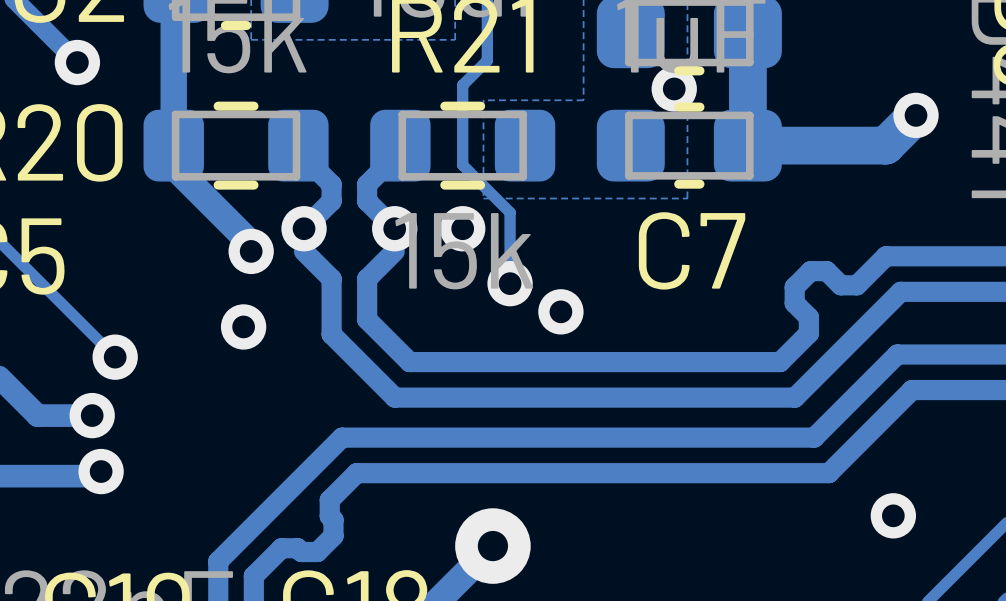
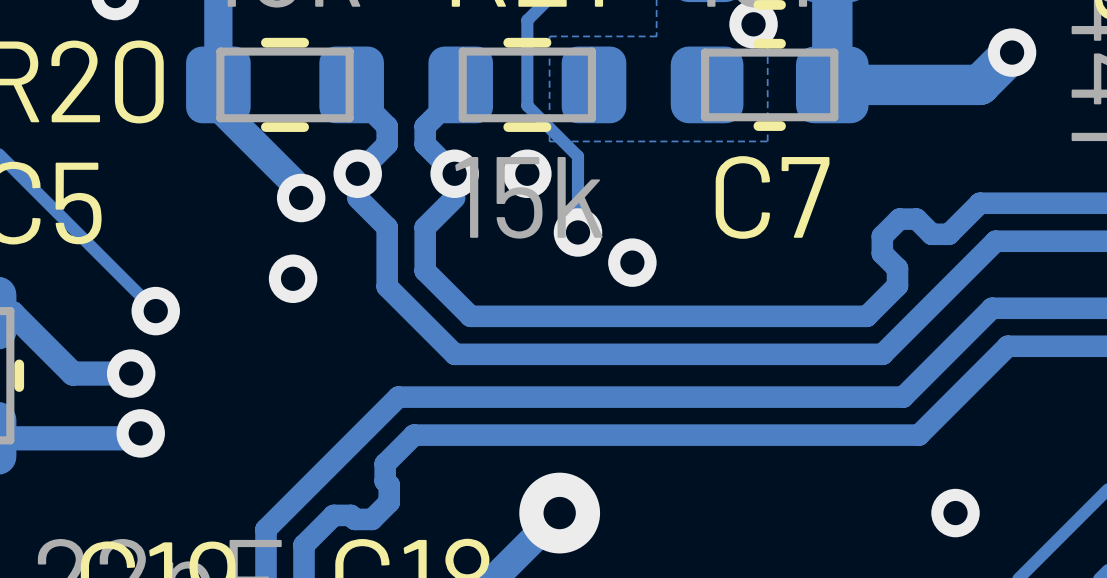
via position: (893, 515) -> (955, 513)

